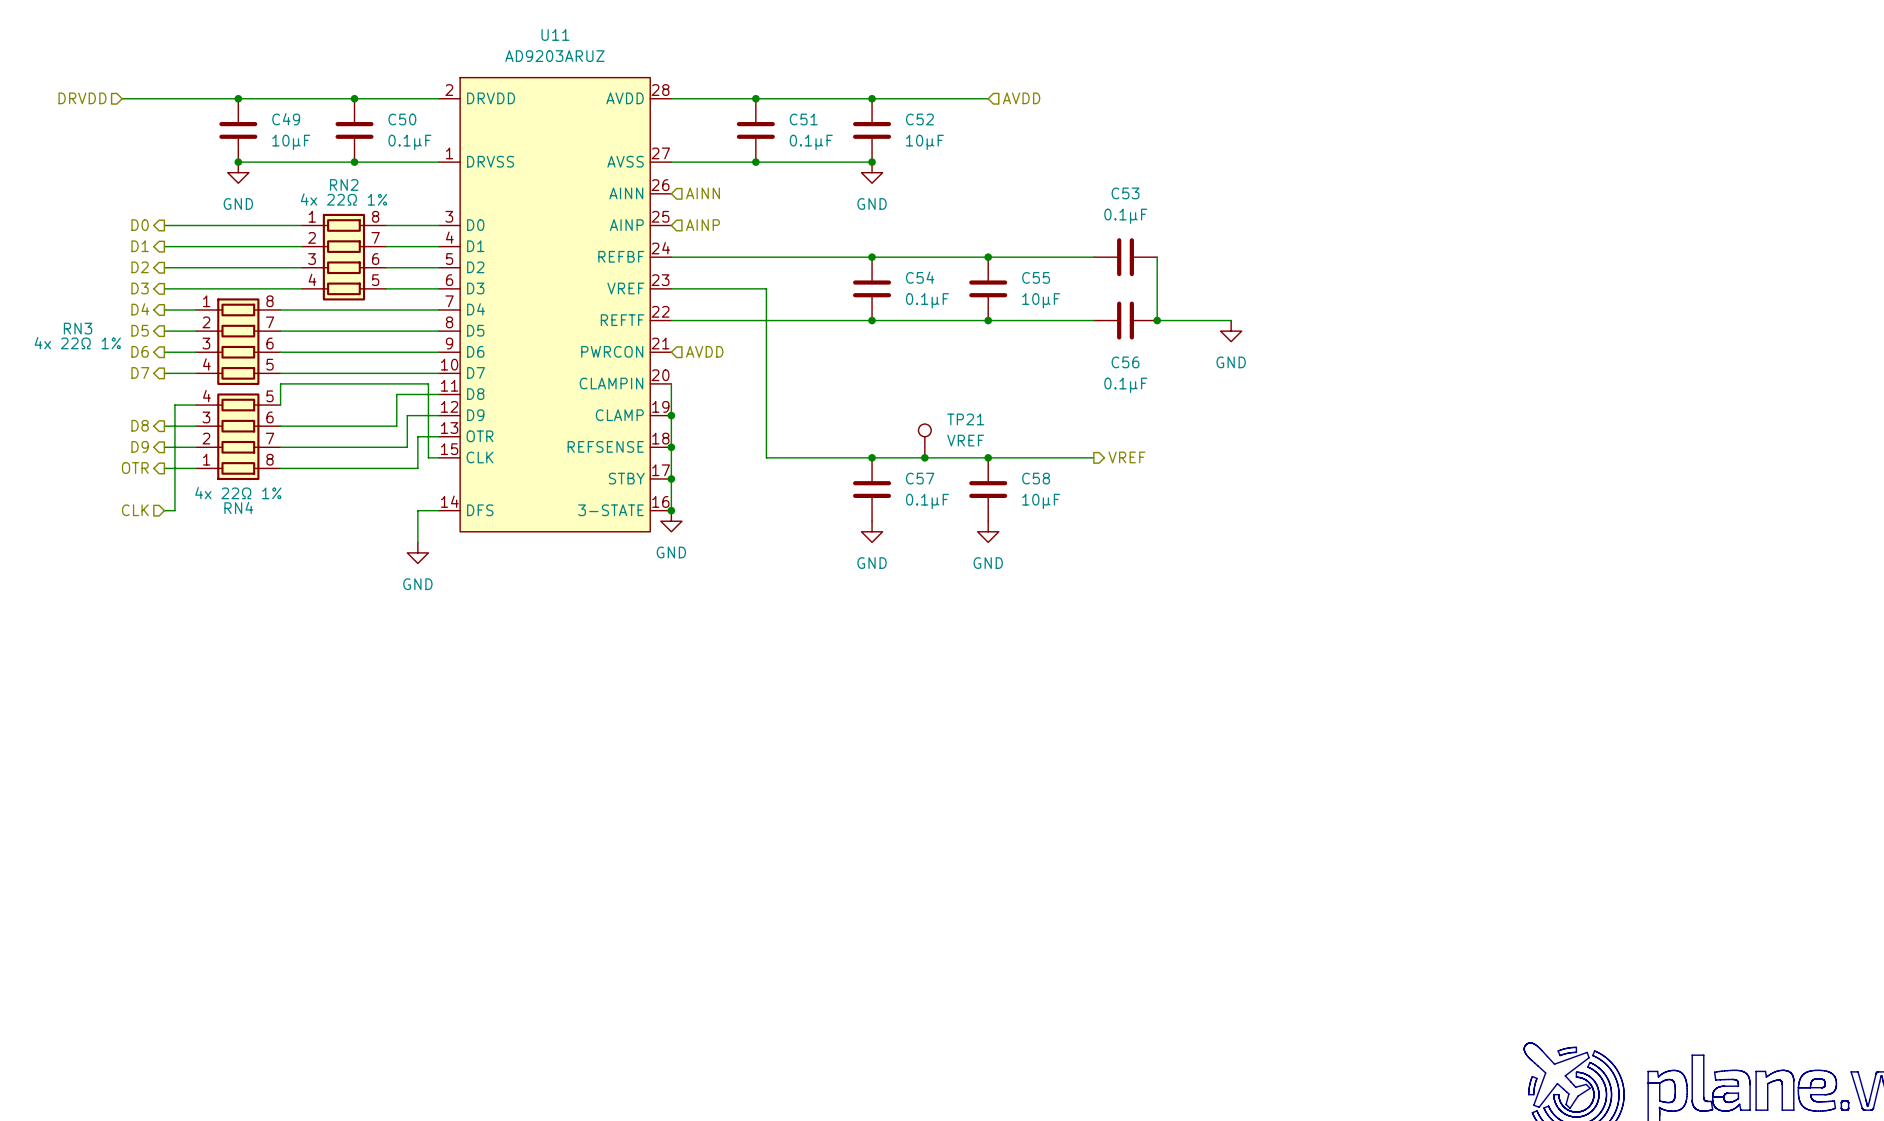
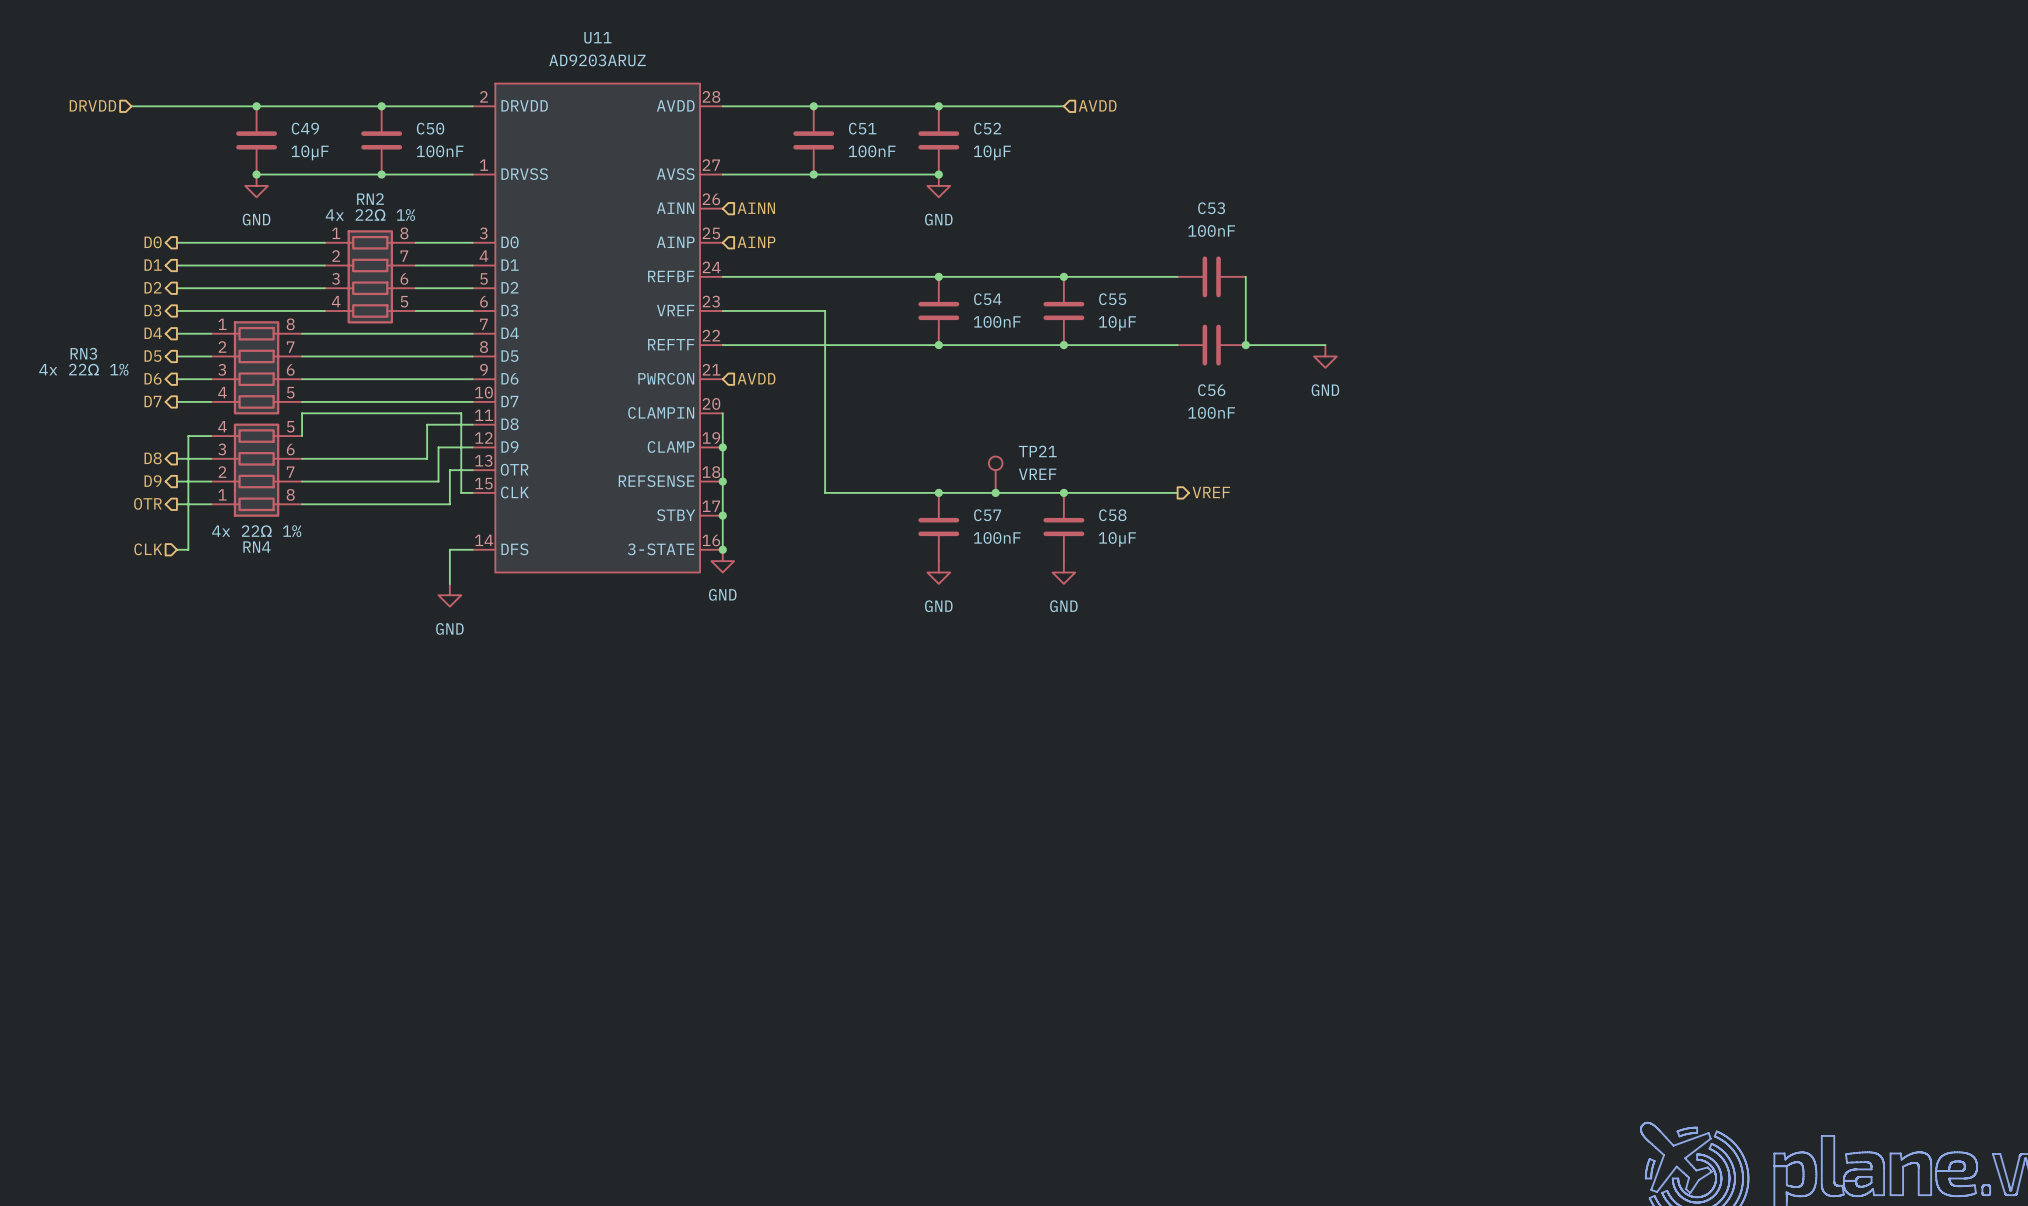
C50 value: 0.1µF (409, 142) -> 100nF (440, 151)
C51 value: 0.1µF (811, 142) -> 100nF (872, 151)
C53 value: 0.1µF (1125, 216) -> 100nF (1211, 230)
C54 value: 0.1µF (927, 300) -> 100nF (997, 321)
C56 value: 0.1µF (1125, 385) -> 100nF (1211, 412)
C57 value: 0.1µF (927, 501) -> 100nF (997, 537)

